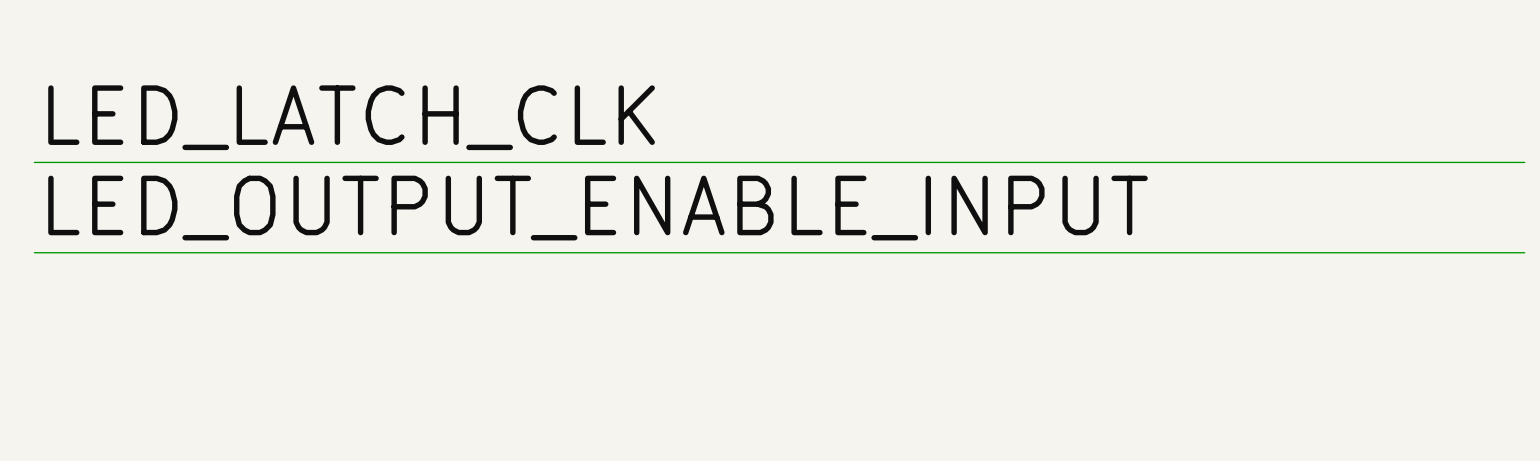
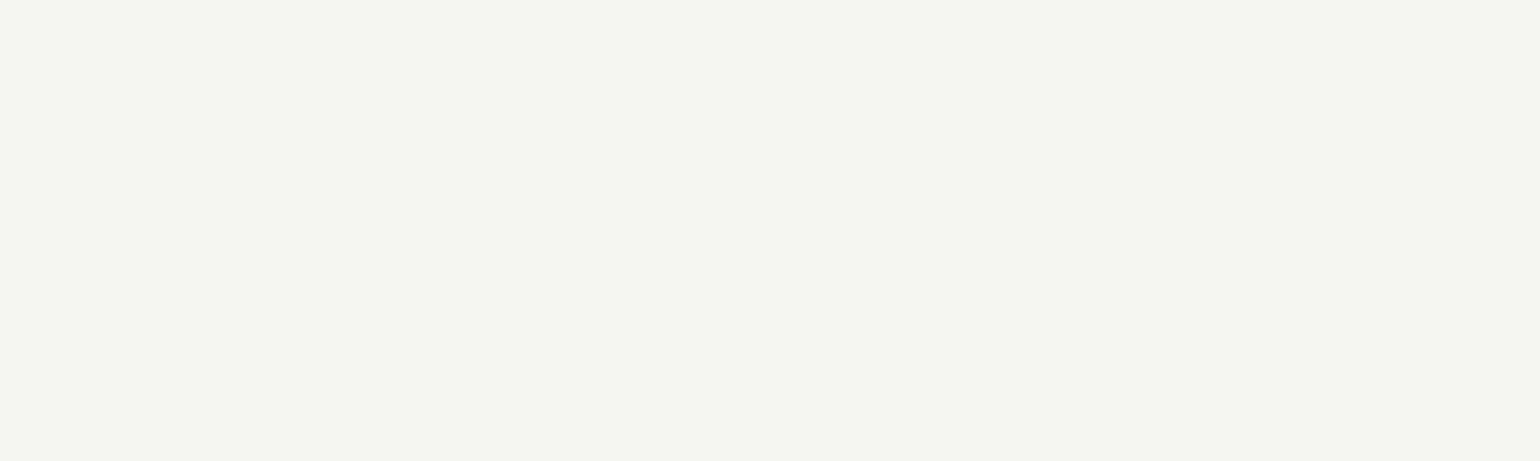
label: LED_LATCH_CLK (351, 117) -> none
wire: (34, 162) (1524, 162) -> none
label: LED_OUTPUT_ENABLE_INPUT (598, 208) -> none
wire: (34, 252) (1524, 252) -> none

